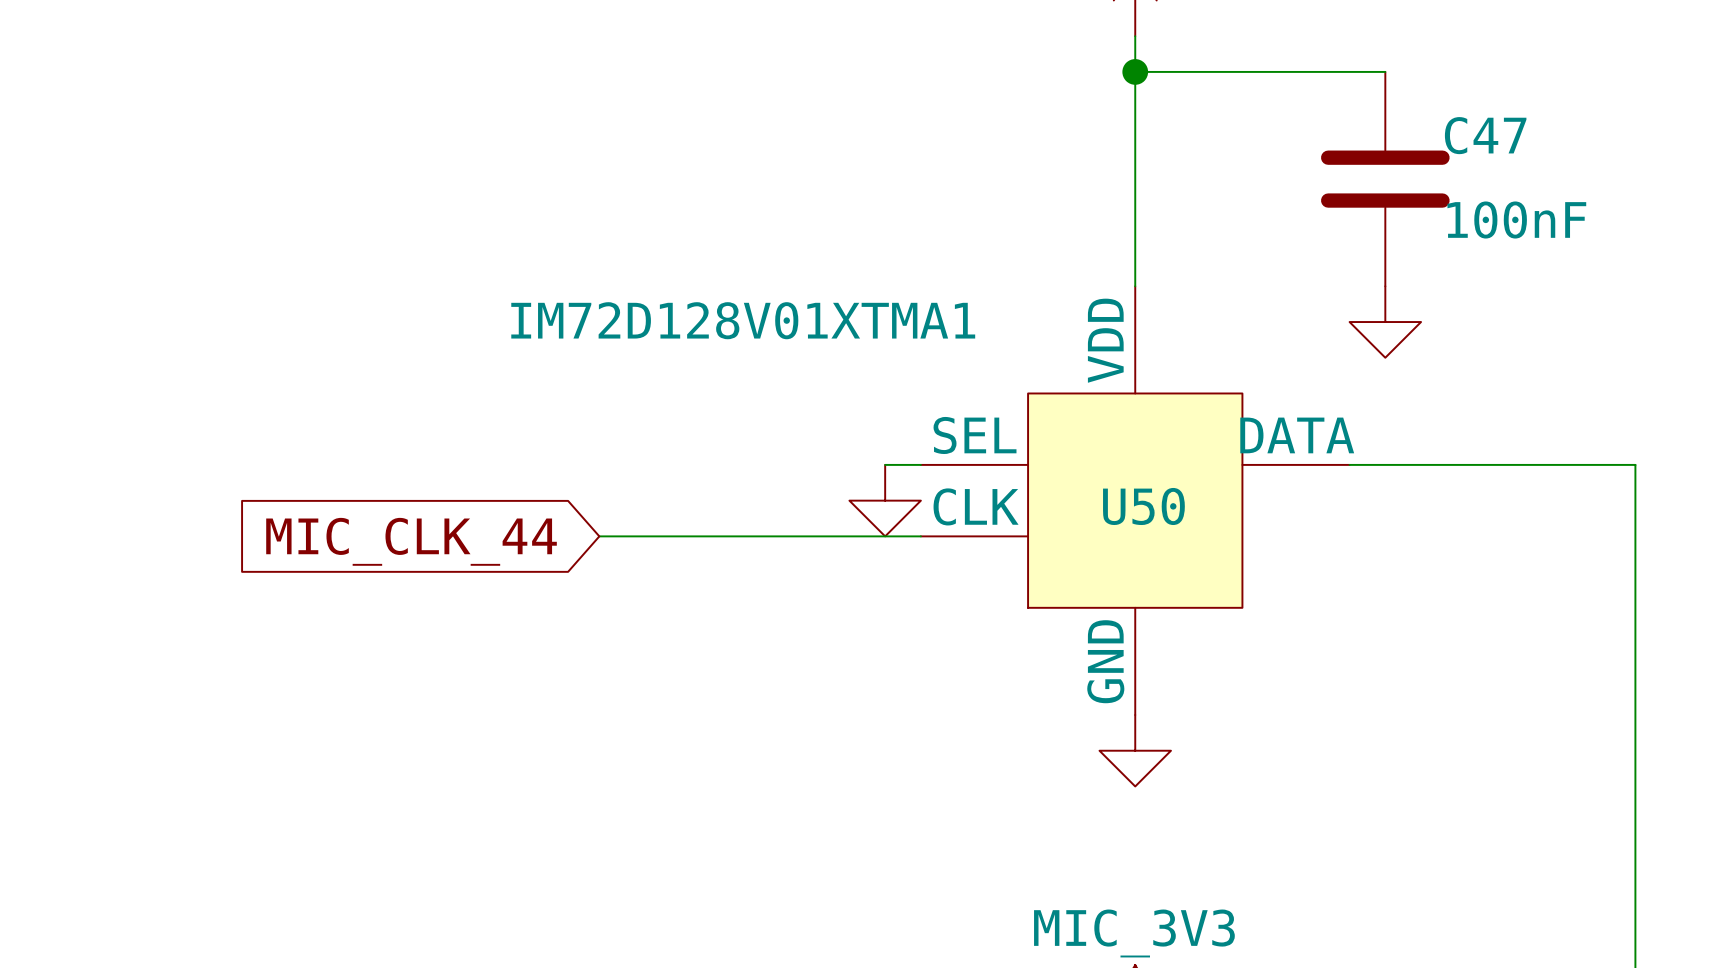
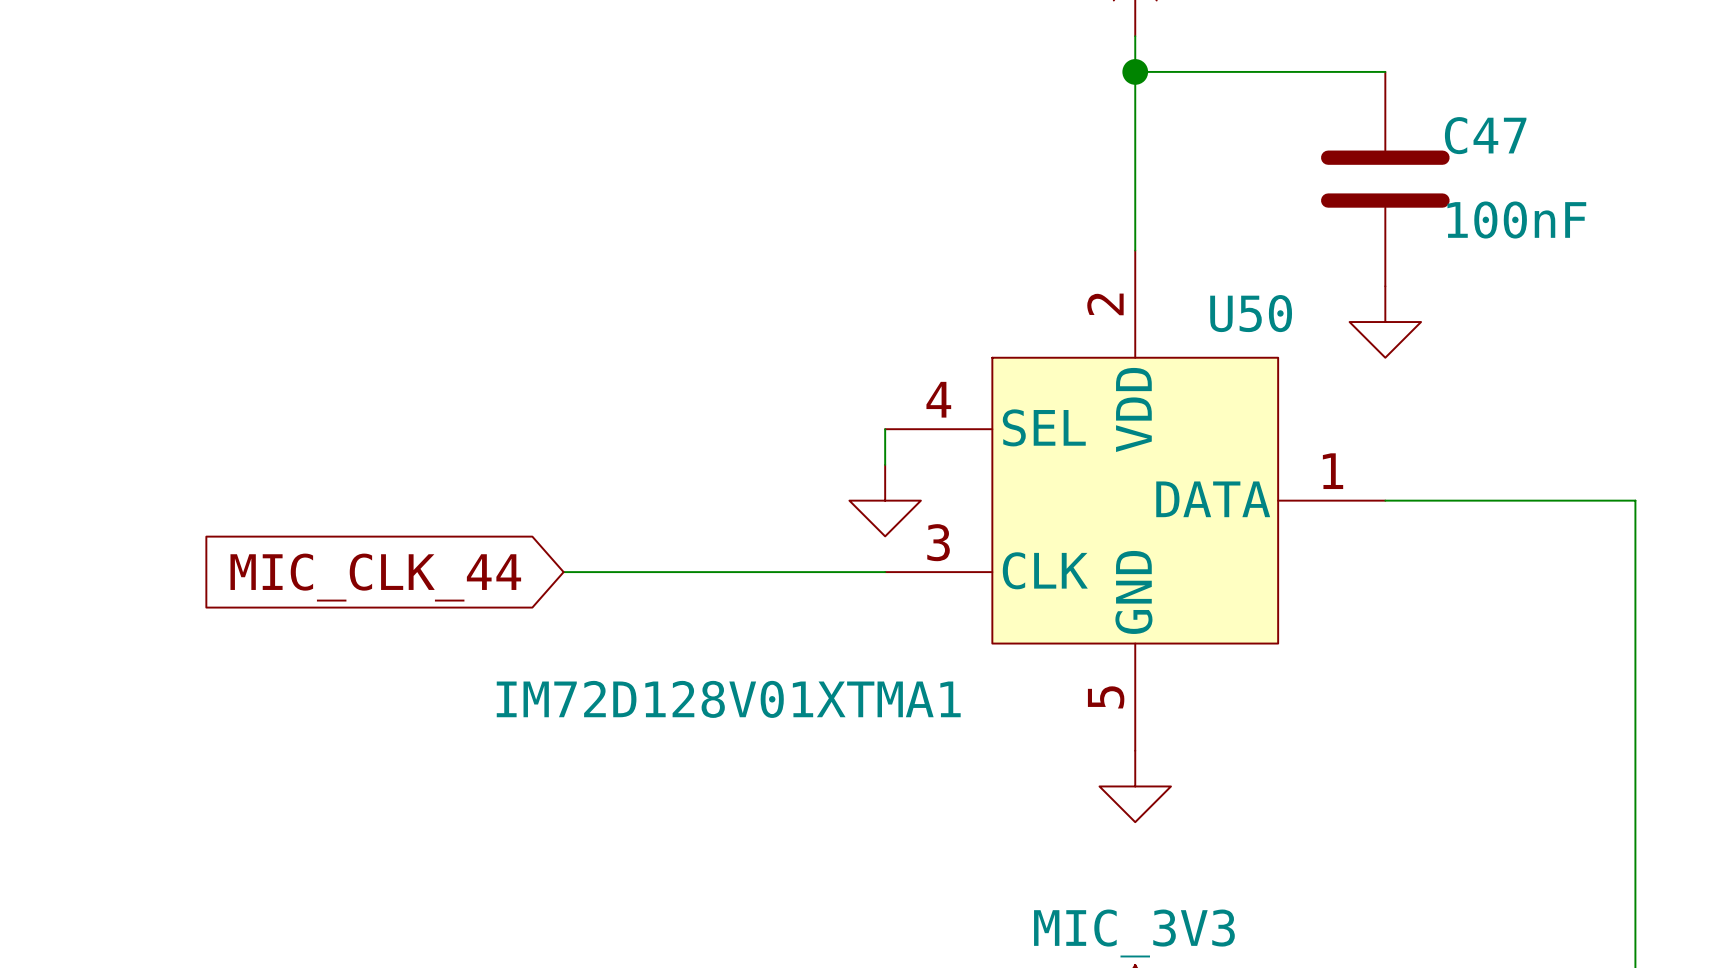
U50 symbol: [920, 286, 1350, 716] -> [885, 250, 1386, 751]
U50 value position: IM72D128V01XTMA1 (743, 320) -> IM72D128V01XTMA1 (728, 699)
wire: (885, 464) (920, 464) -> (885, 464) (885, 429)
wire: (1349, 464) (1635, 464) (1635, 500) -> (1385, 500) (1635, 500)
U50 name position: U50 (1143, 506) -> U50 (1251, 313)
wire: (599, 536) (920, 536) -> (563, 572) (885, 572)
global label position: MIC_CLK_44 (411, 541) -> MIC_CLK_44 (375, 577)
power symbol position: (1135, 750) -> (1135, 786)

